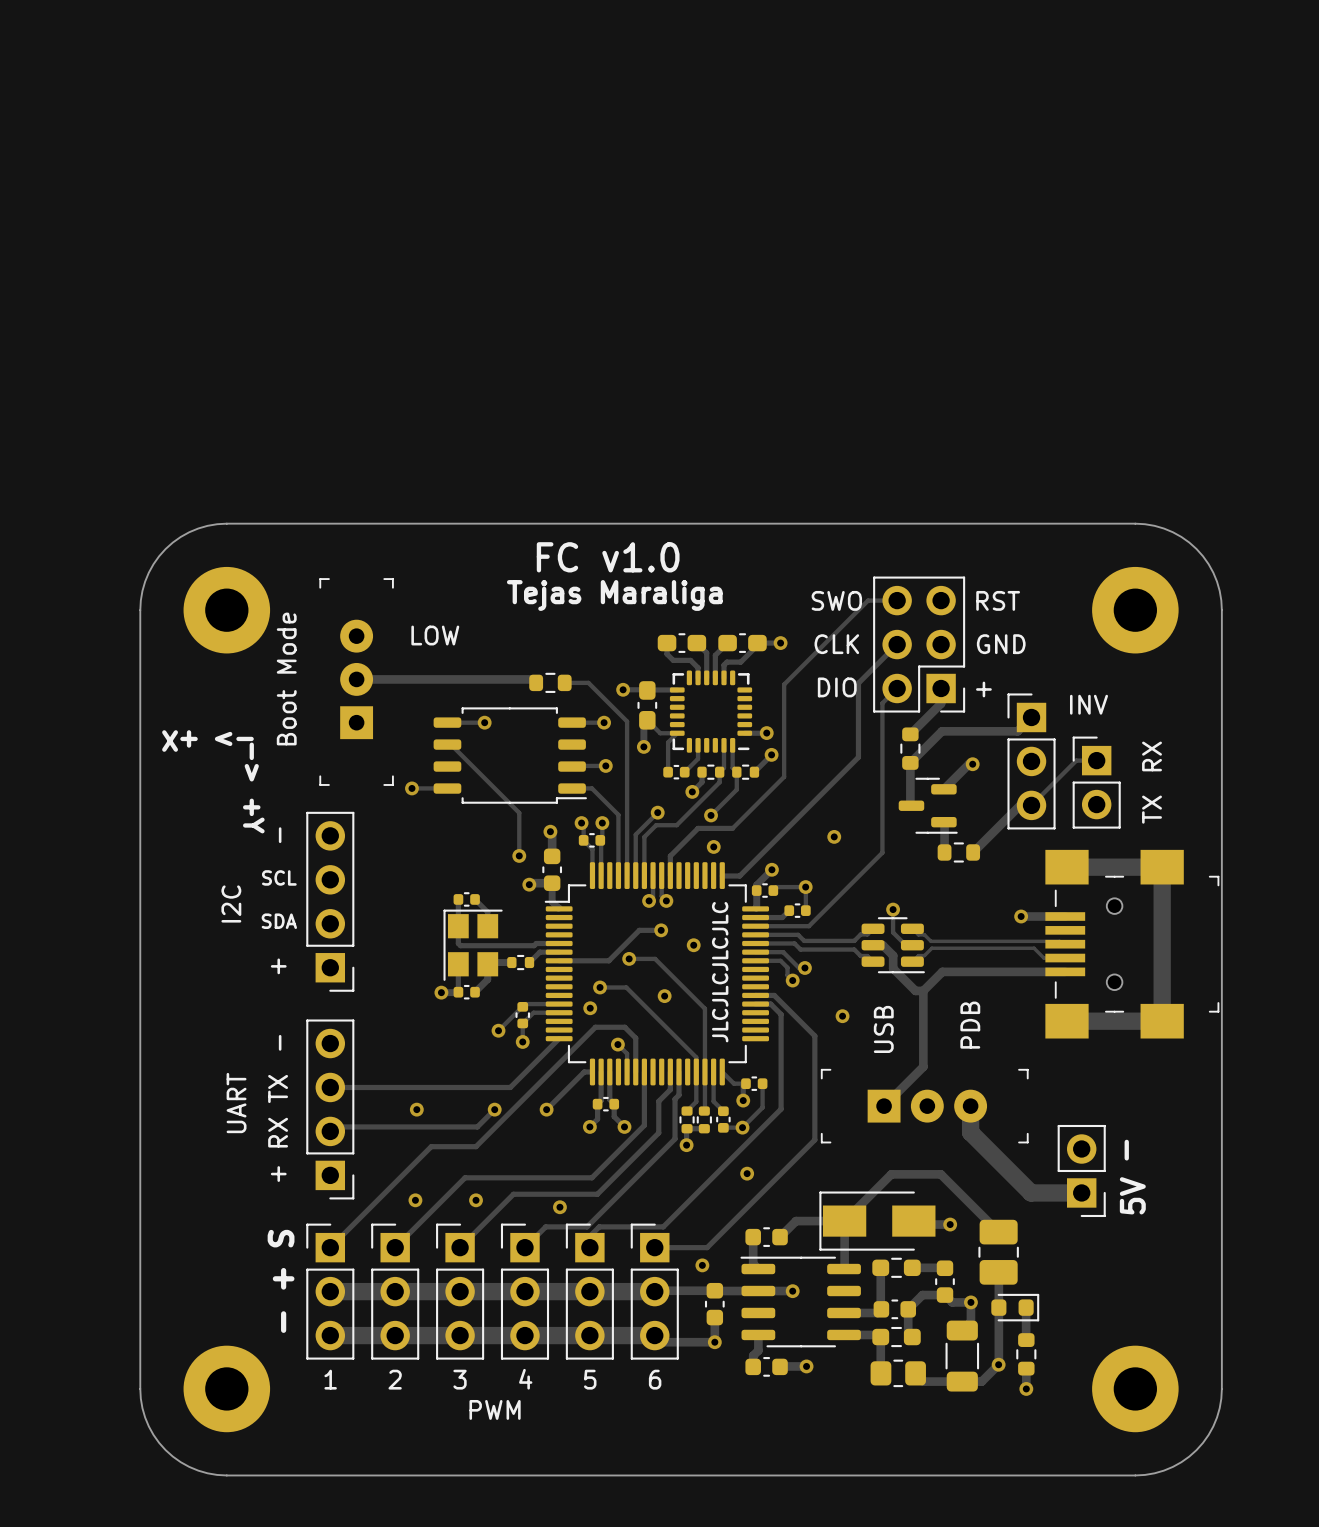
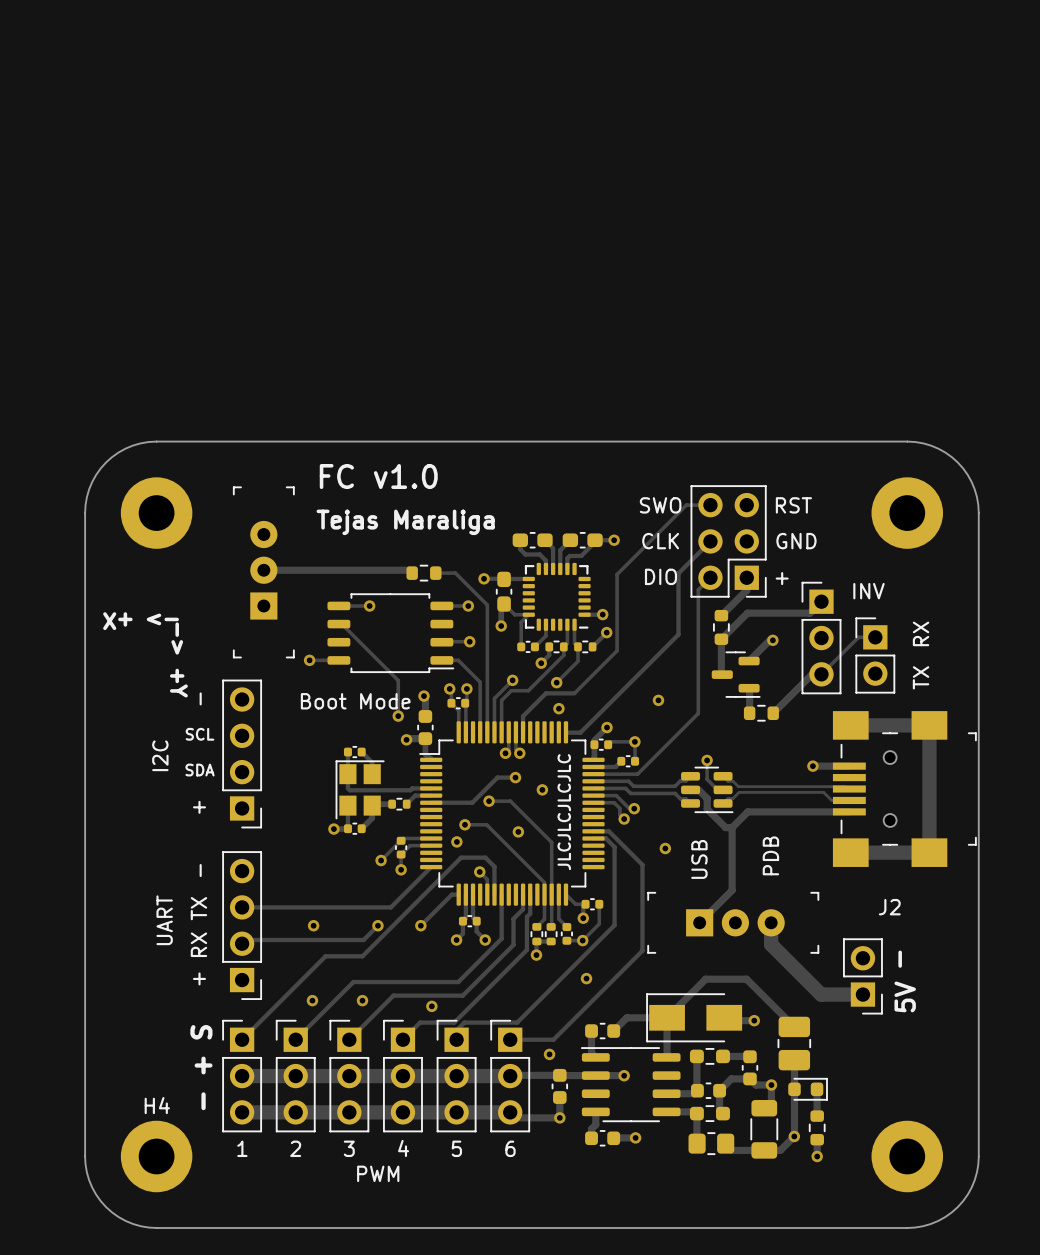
text position: FC v1.0 (608, 557) -> FC v1.0 (378, 476)
text position: Tejas Maraliga (614, 595) -> Tejas Maraliga (405, 522)
text: LOW (435, 635) -> none
text rotation: 0° (286, 679) -> 90° clockwise (355, 701)
text position: Boot Mode (286, 679) -> Boot Mode (355, 701)
J2 name: none -> J2 (889, 907)
H4 name: none -> H4 (157, 1105)

